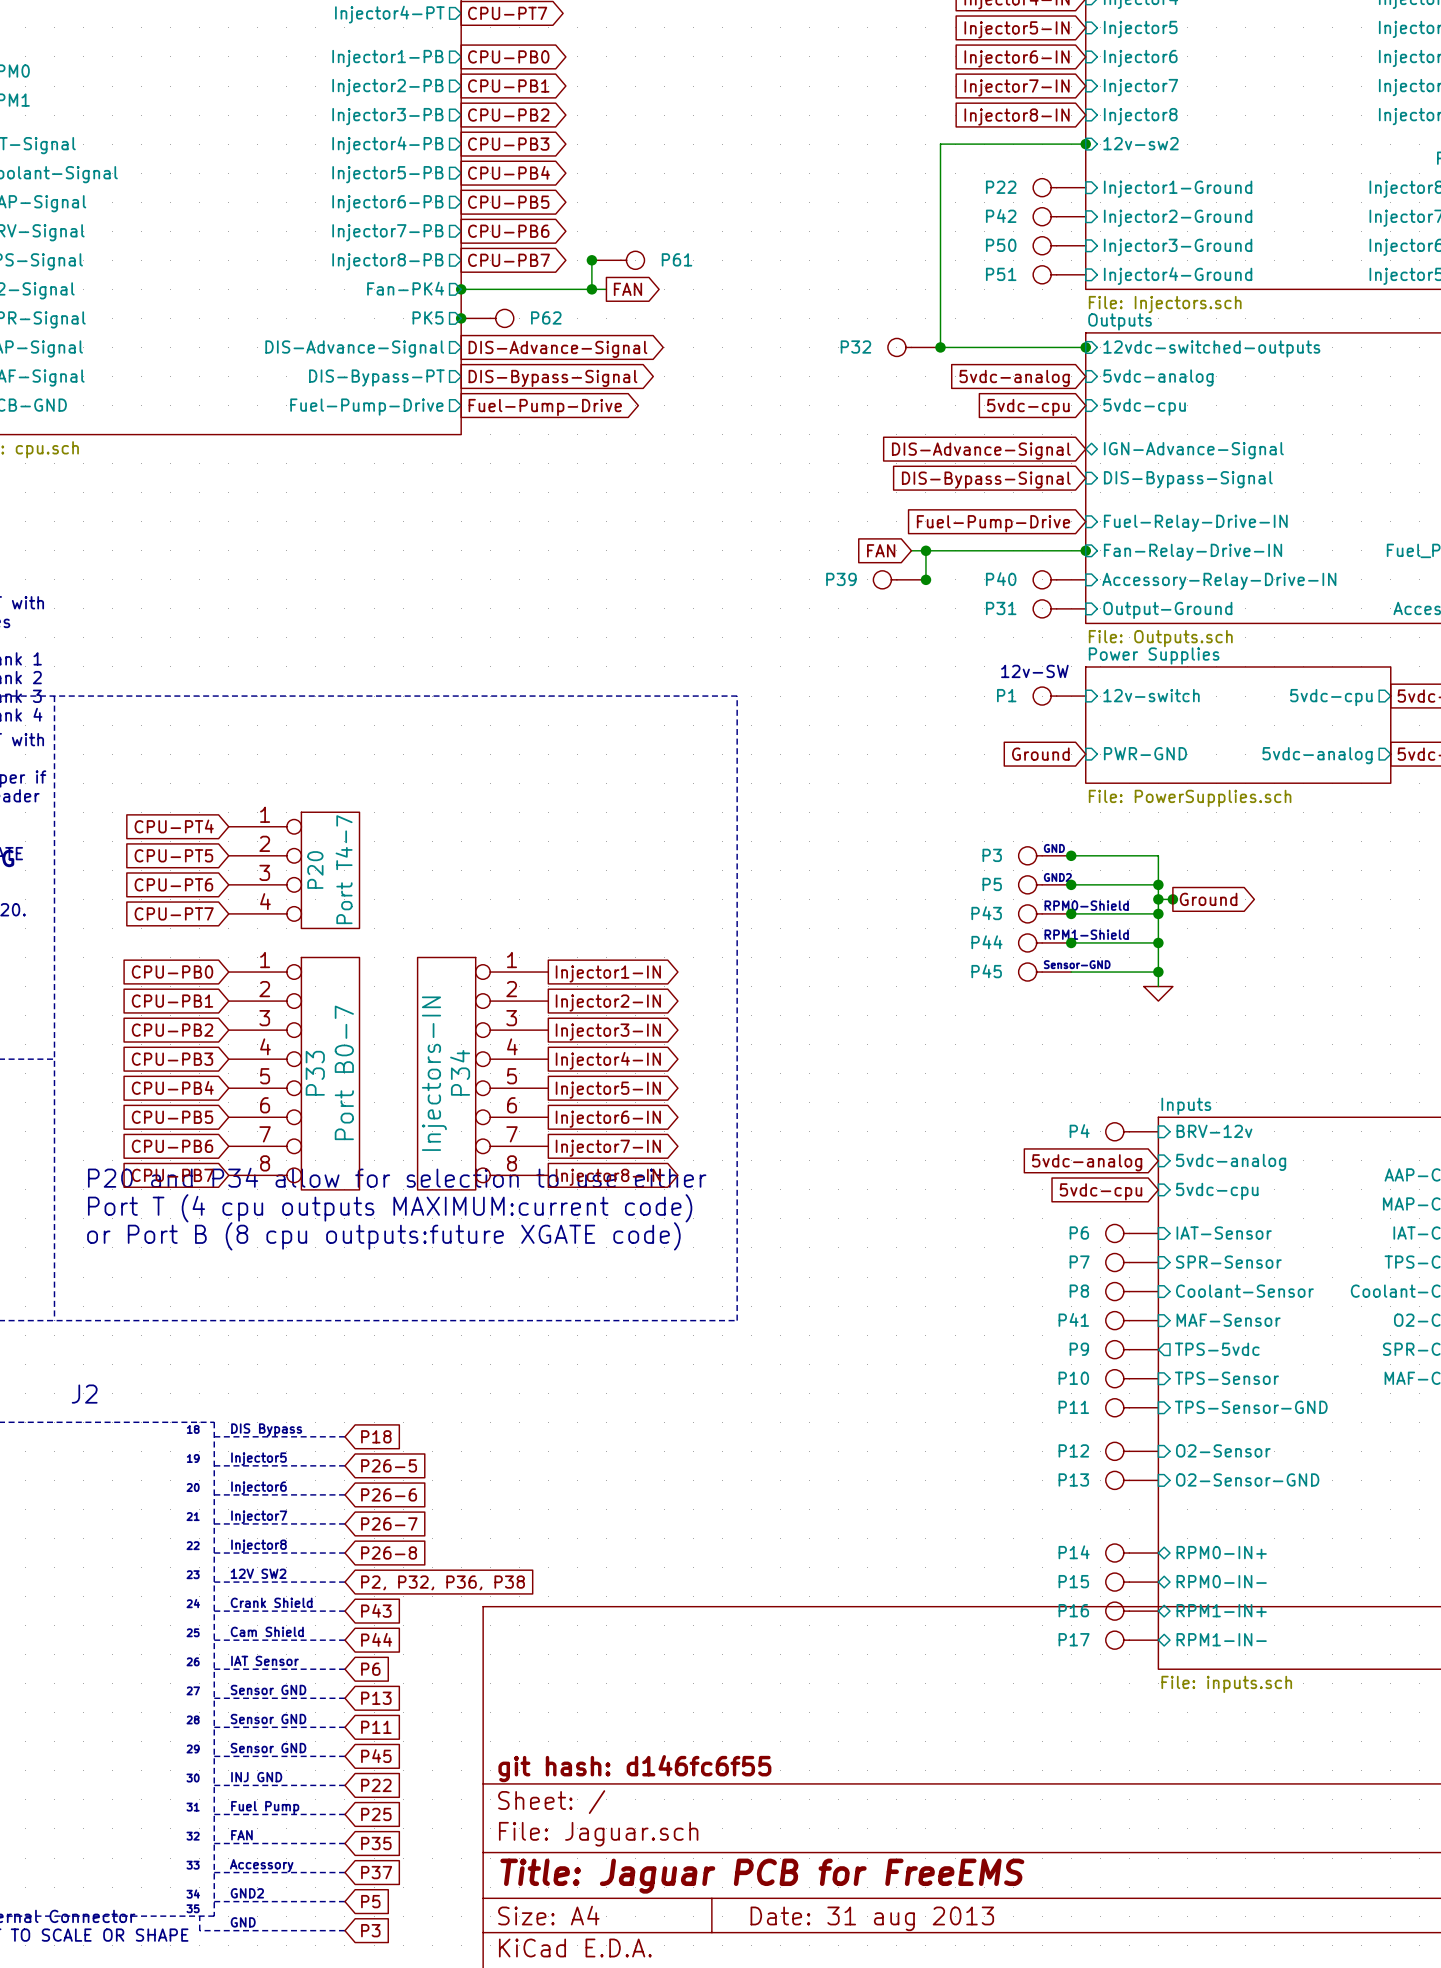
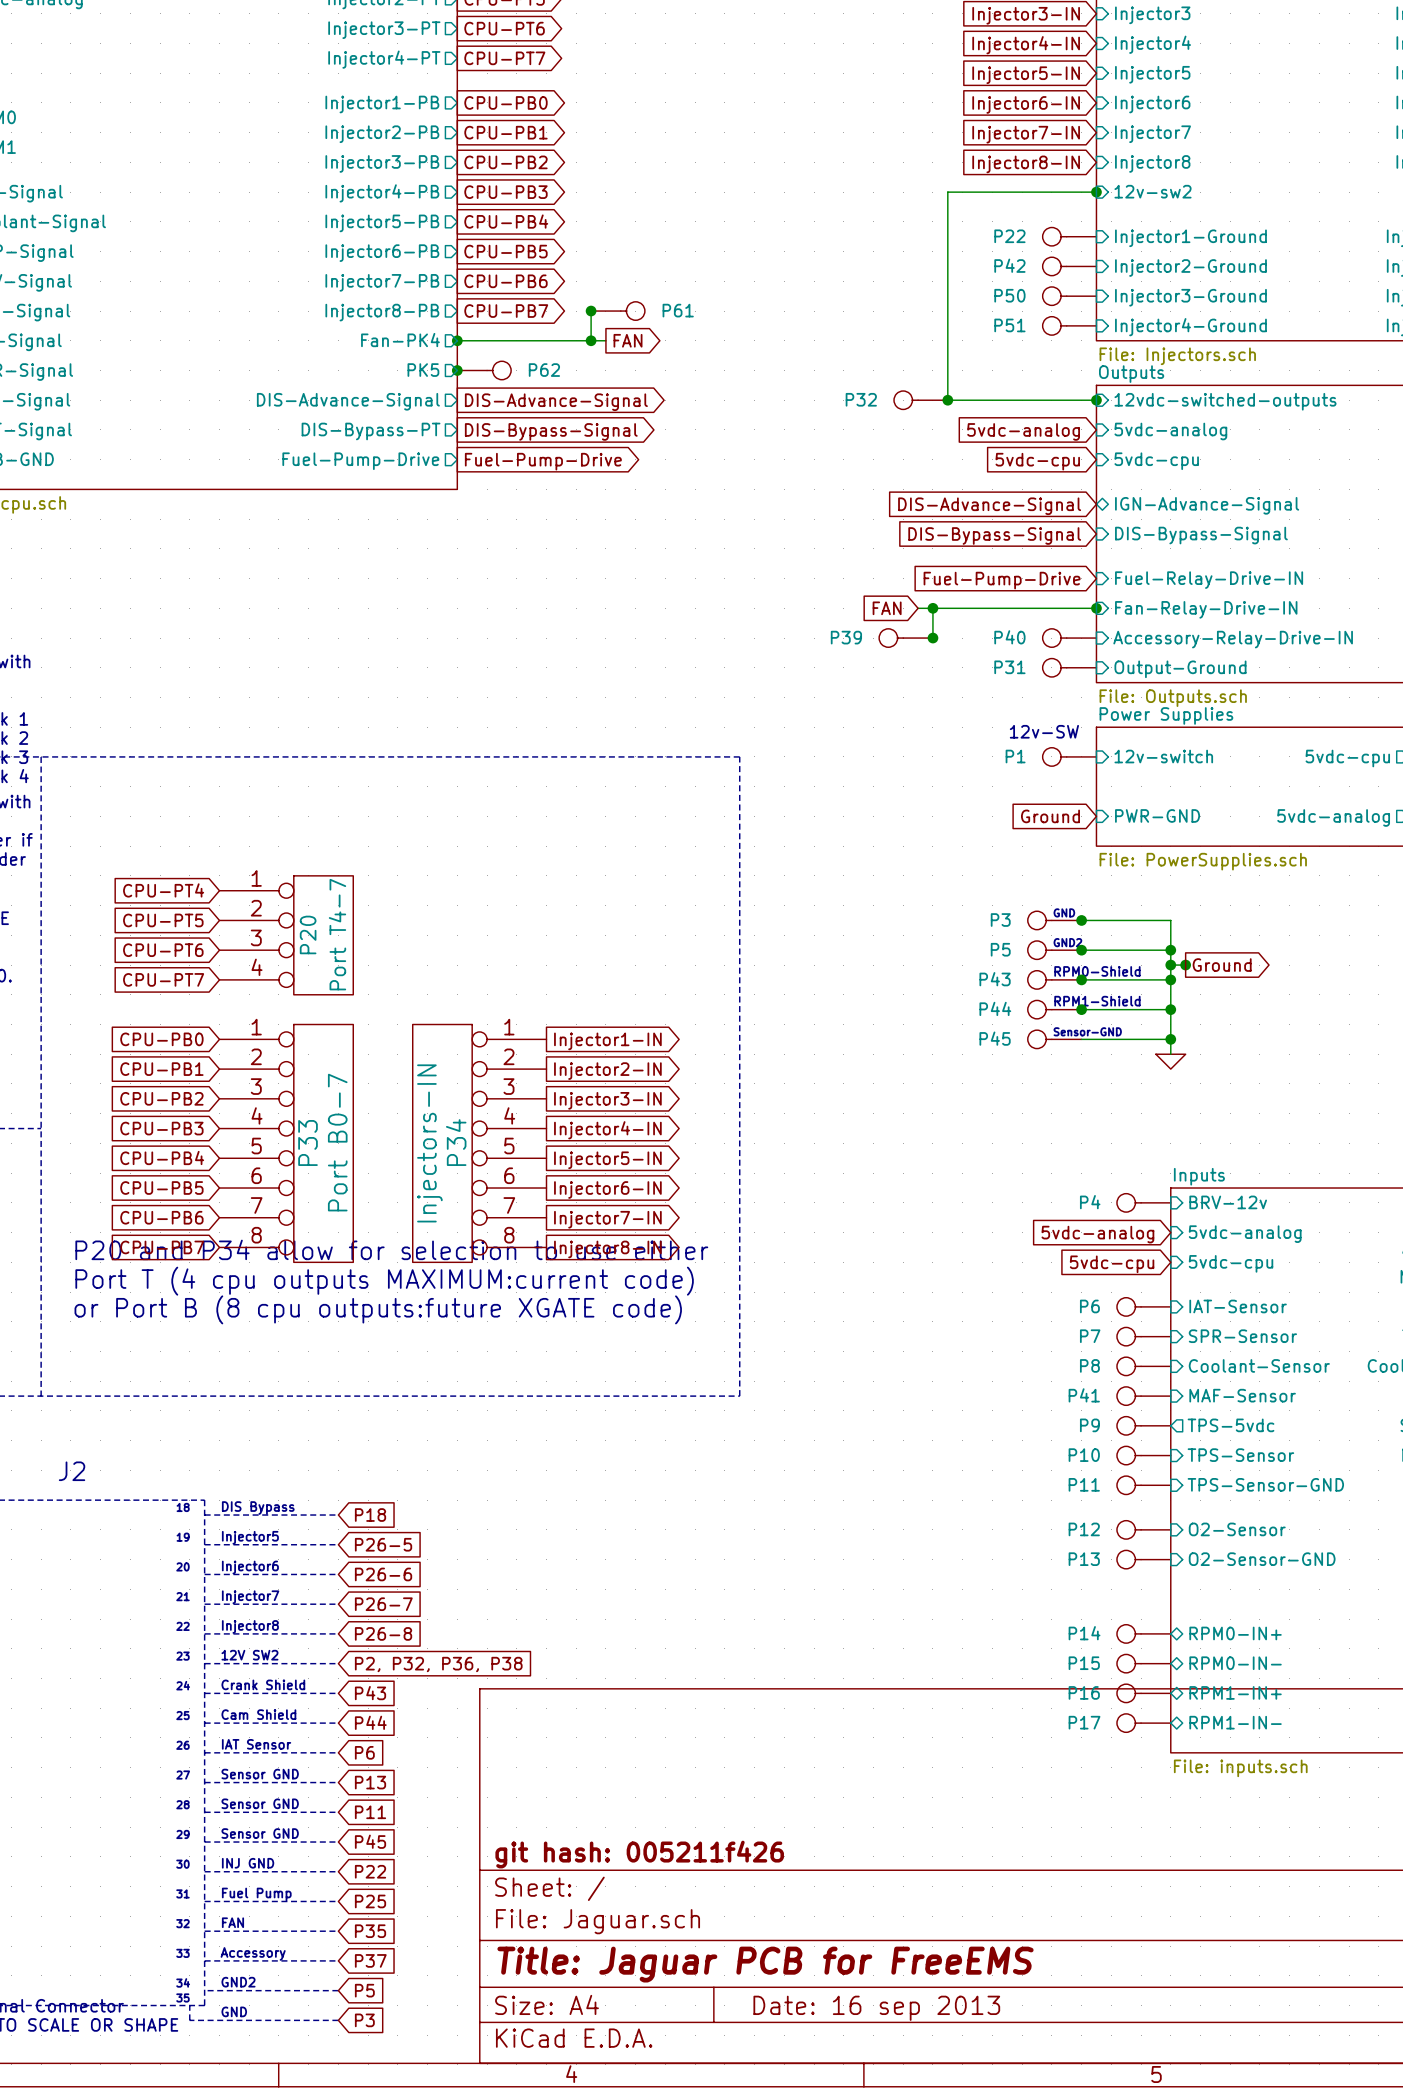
title block: git hash: d146fc6f55 (634, 1768) -> git hash: 005211f426 (639, 1854)
title block: Date: 31 aug 2013 (872, 1918) -> Date: 16 sep 2013 (876, 2008)

